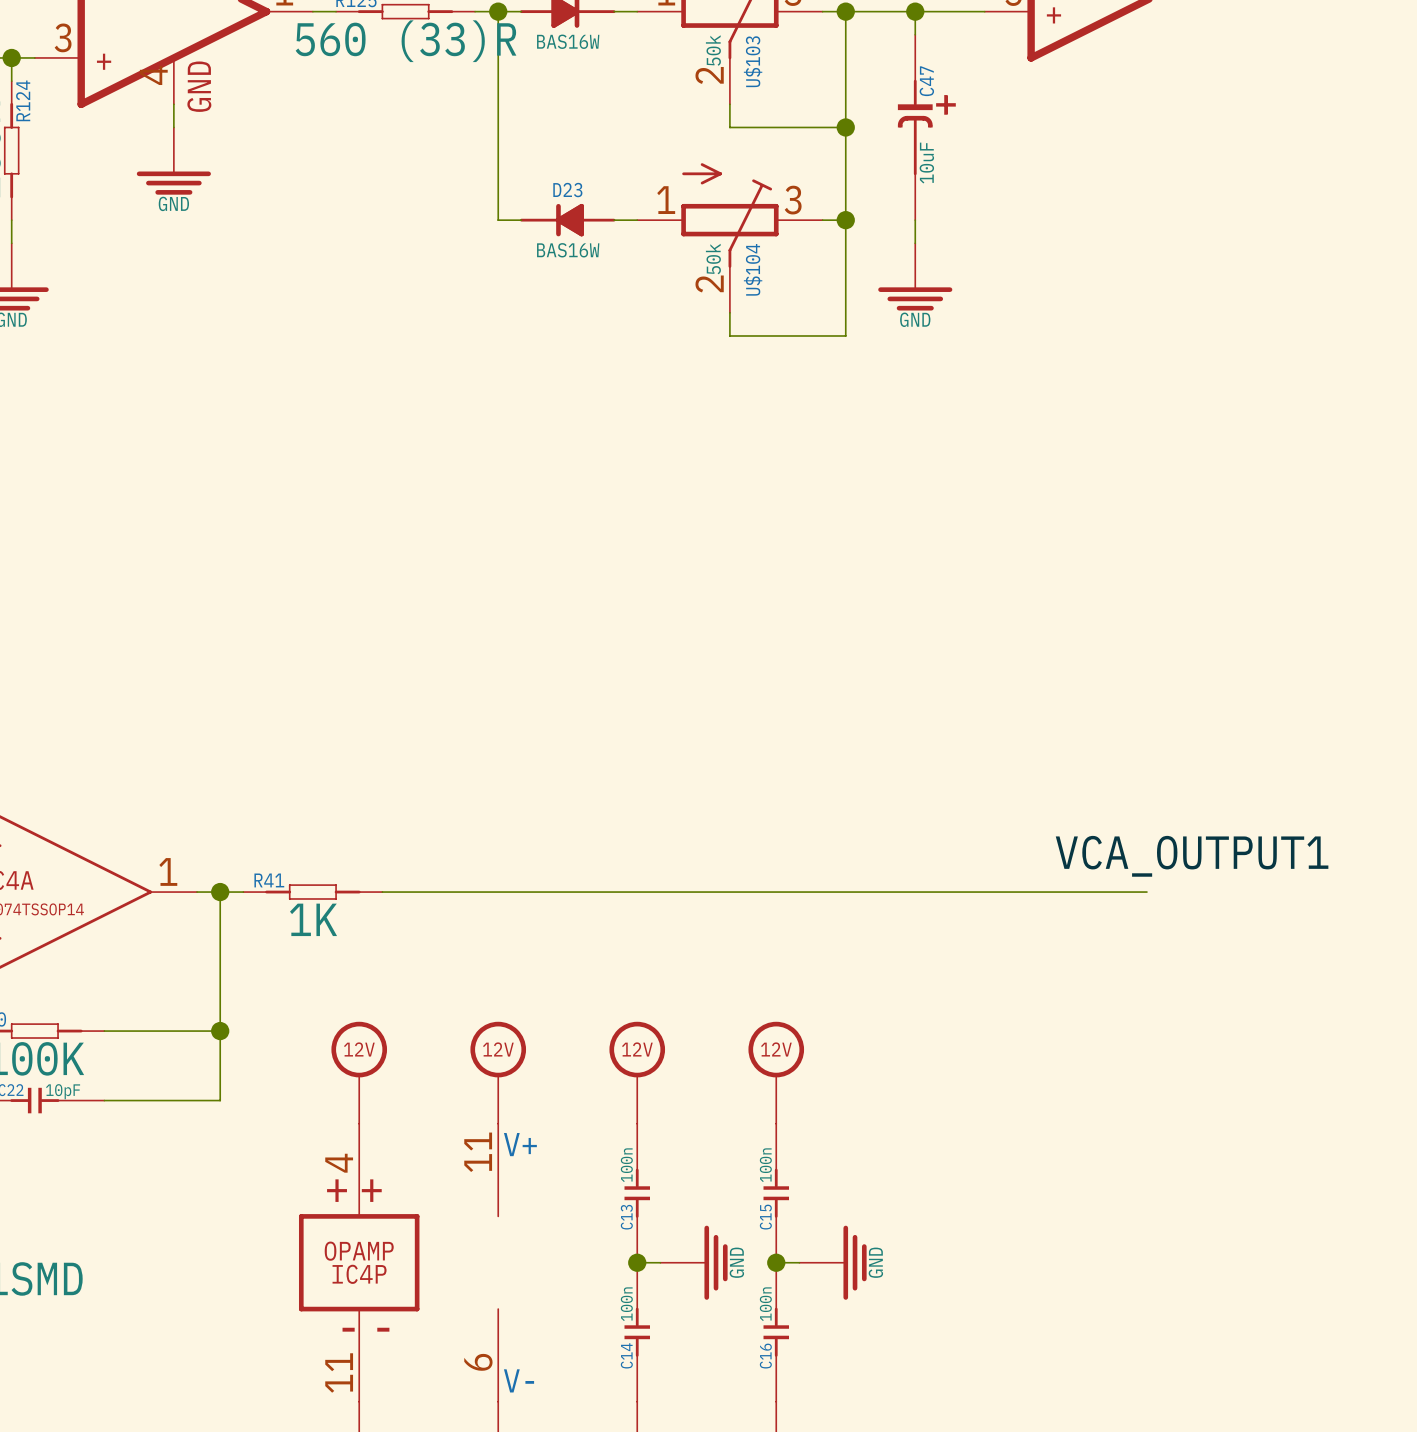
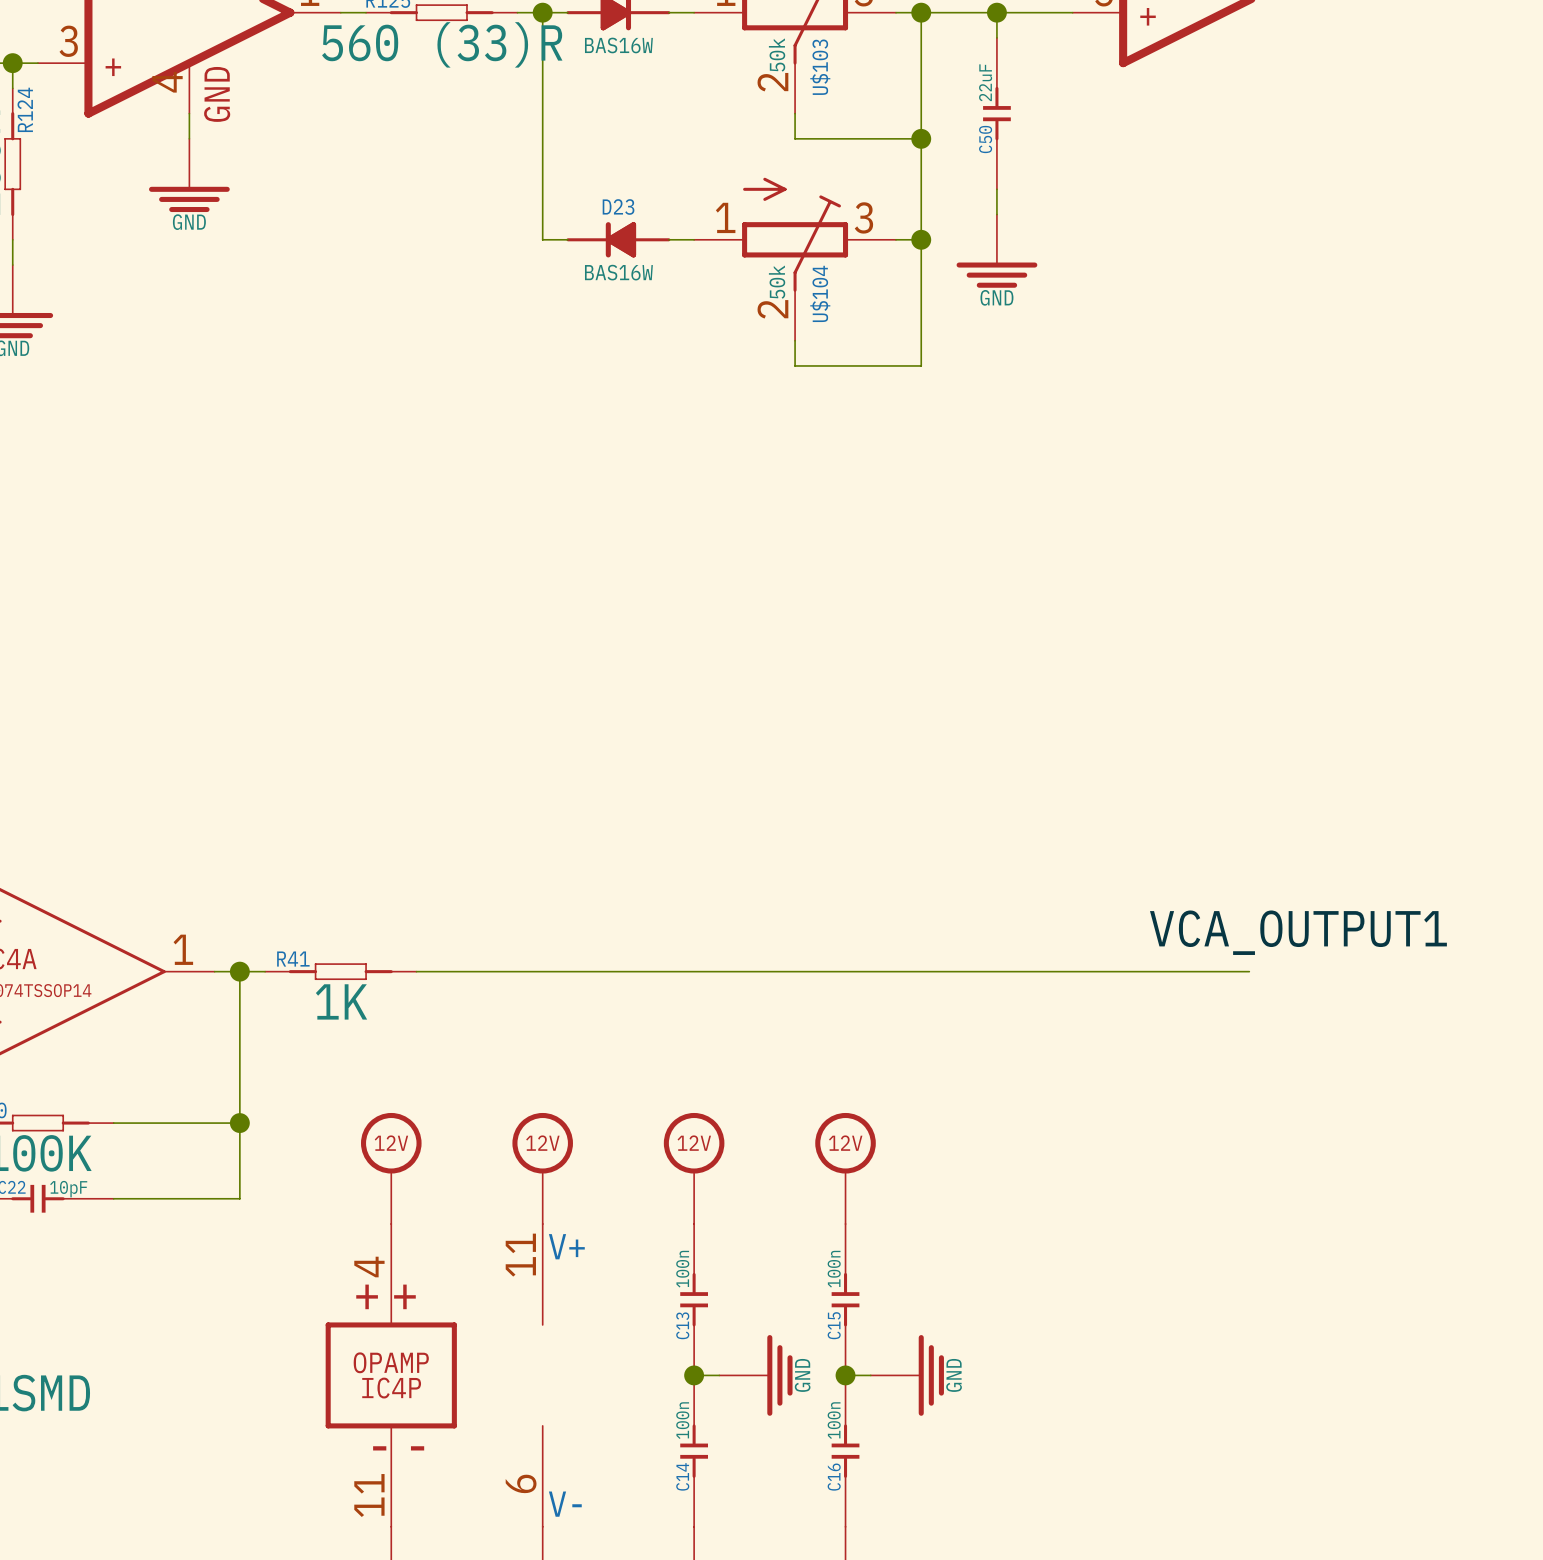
C50: none -> 22uF (996, 113)
C47: 10uF (926, 127) -> none
power symbol position: GND (915, 276) -> GND (996, 251)

